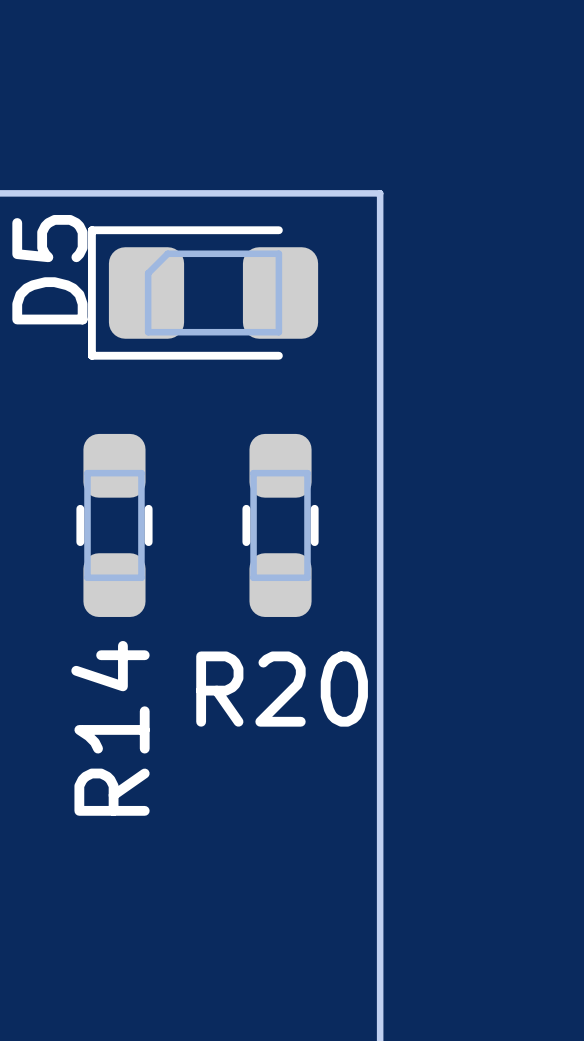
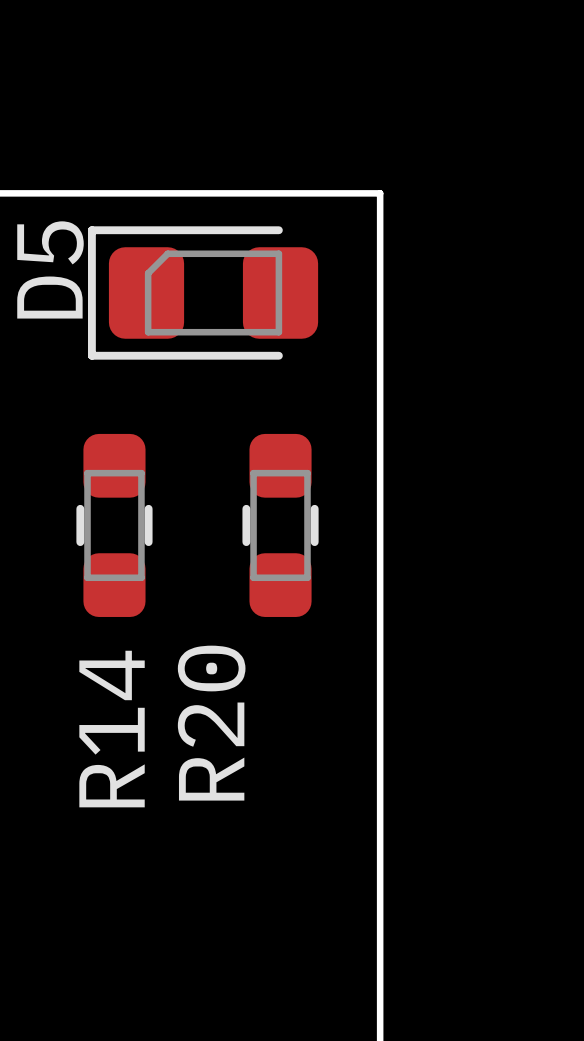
R20 name rotation: 0° (282, 689) -> 90° counterclockwise (211, 723)

